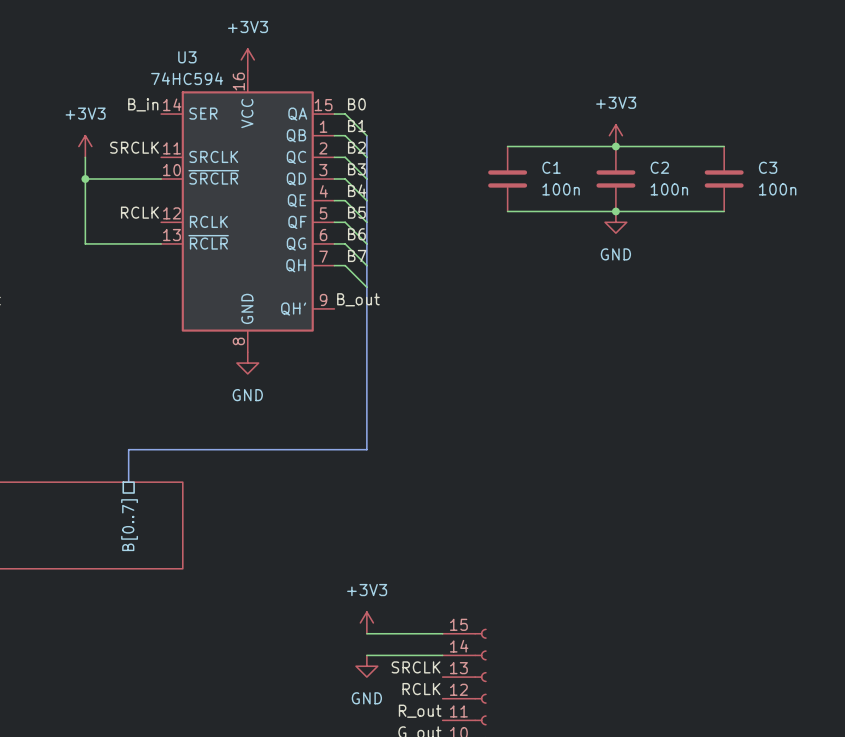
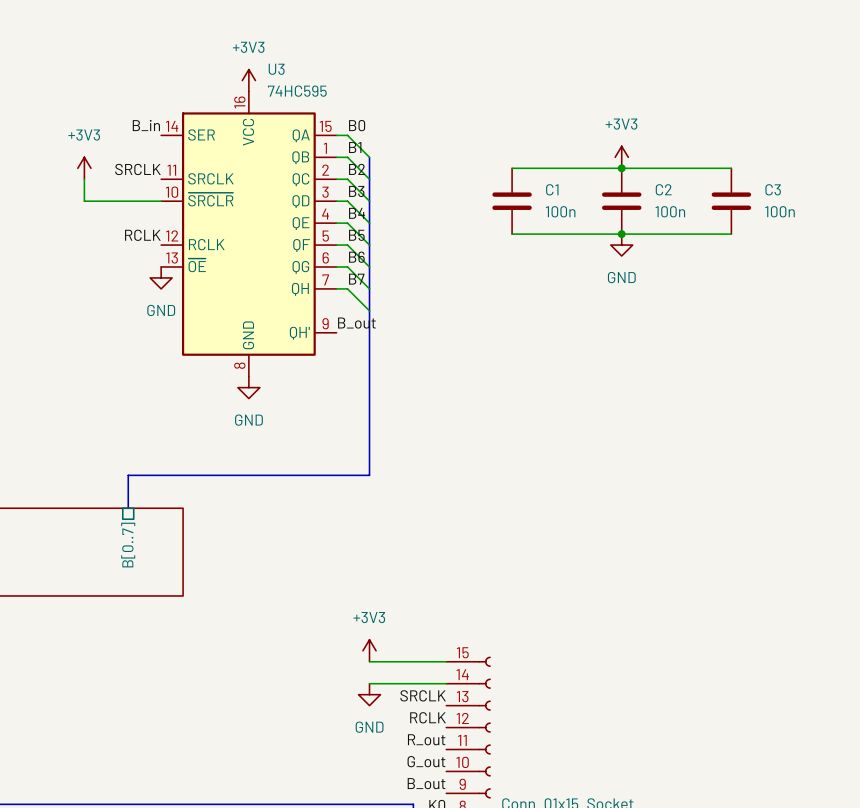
U3 name position: U3 (187, 57) -> U3 (276, 69)
U3 value: 74HC594 (187, 78) -> 74HC595 (297, 91)
wire: (85, 179) (85, 243) (161, 243) -> none
junction: (85, 179) -> none
U3 pin name: ~{RCLR} (208, 242) -> ~{OE} (197, 265)
power symbol: none -> GND (161, 277)

